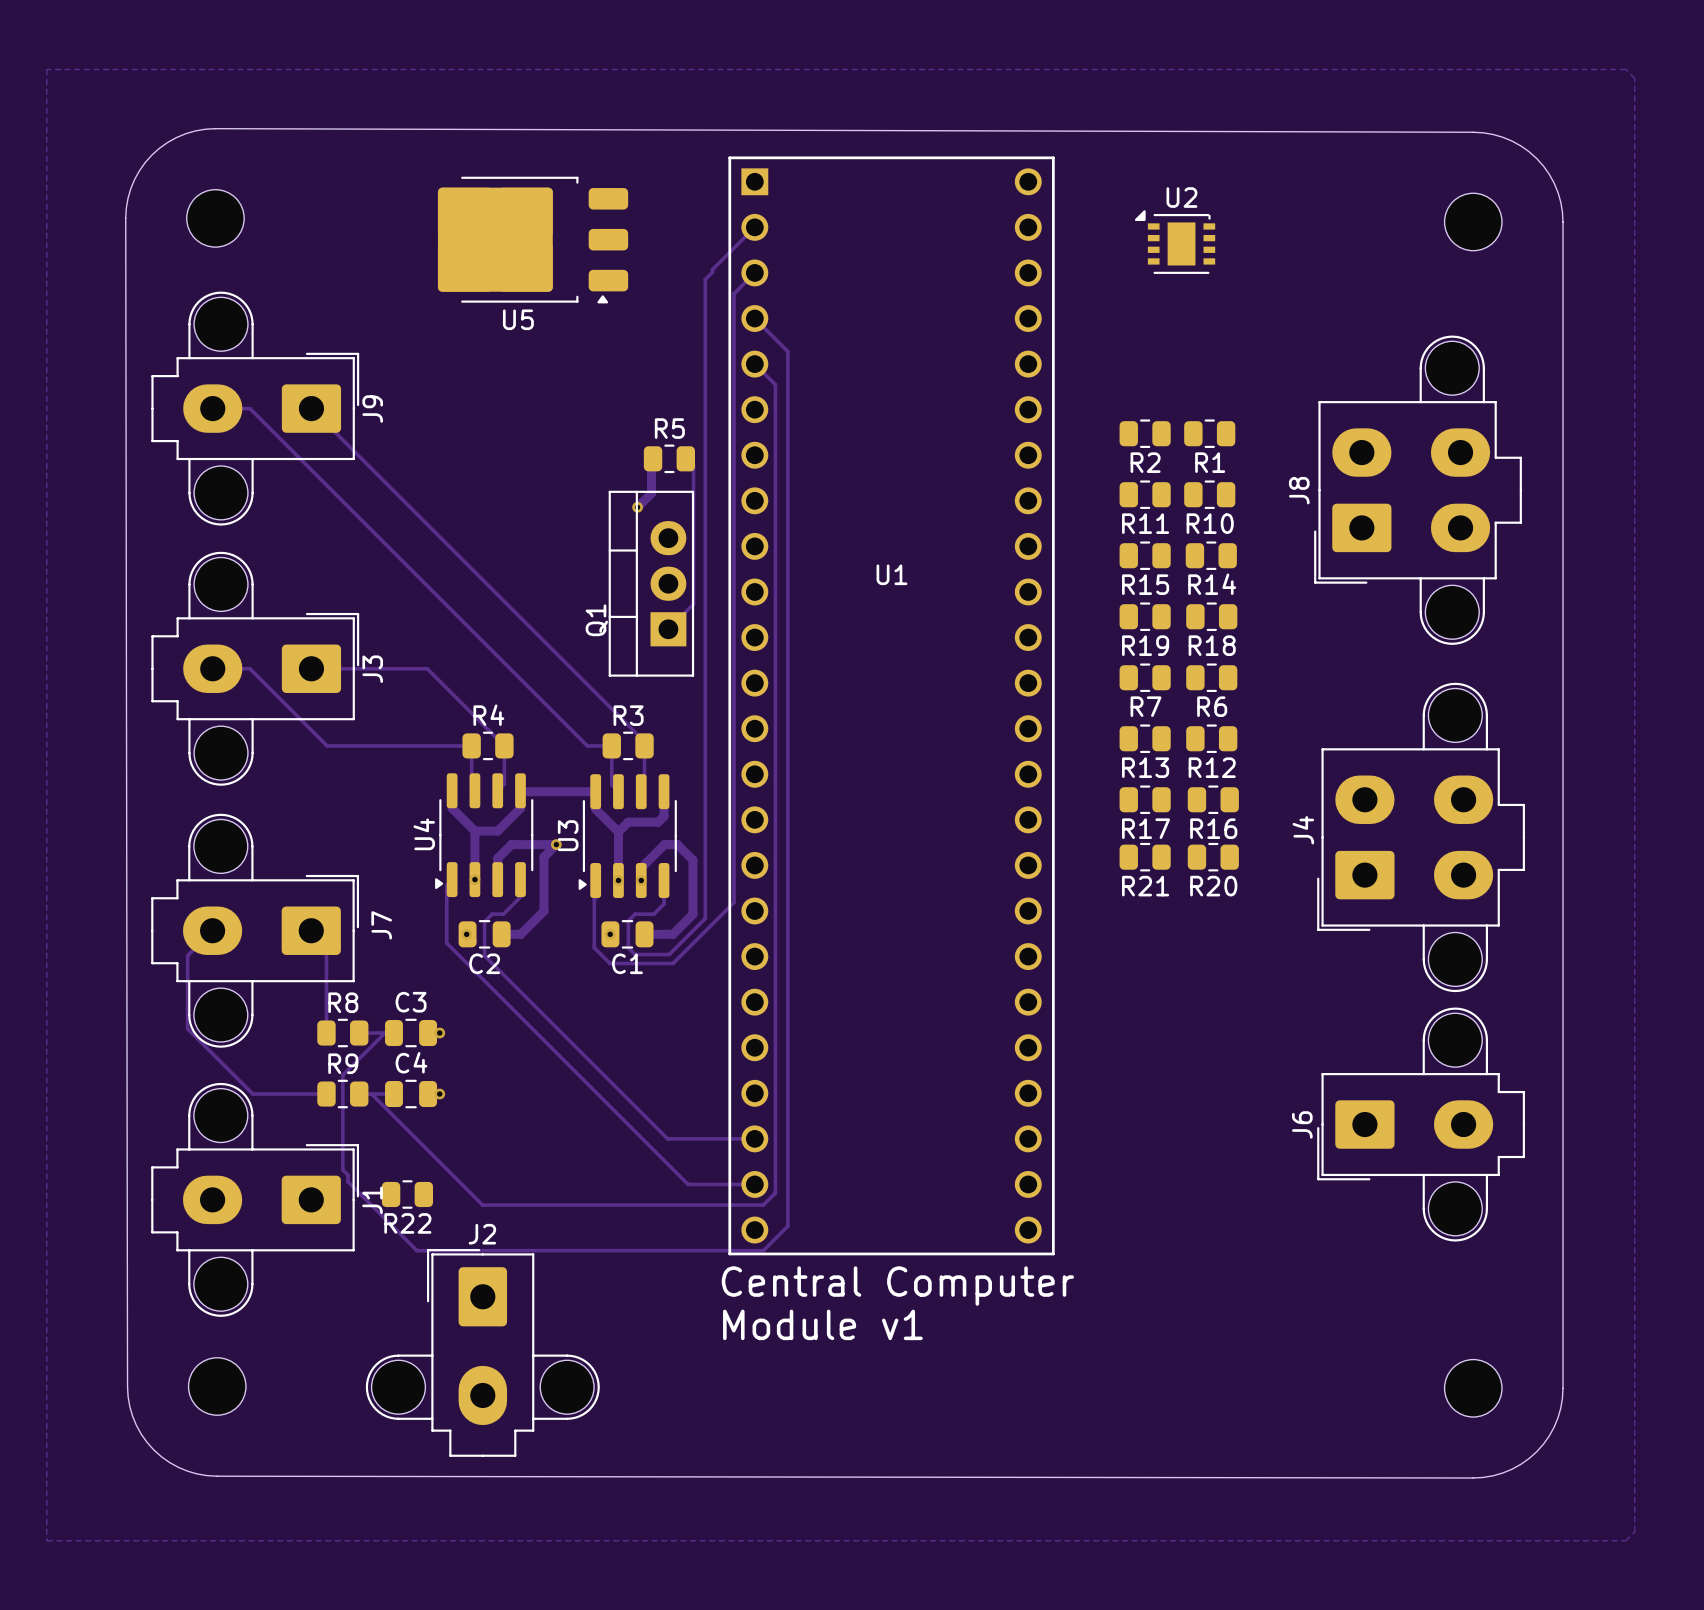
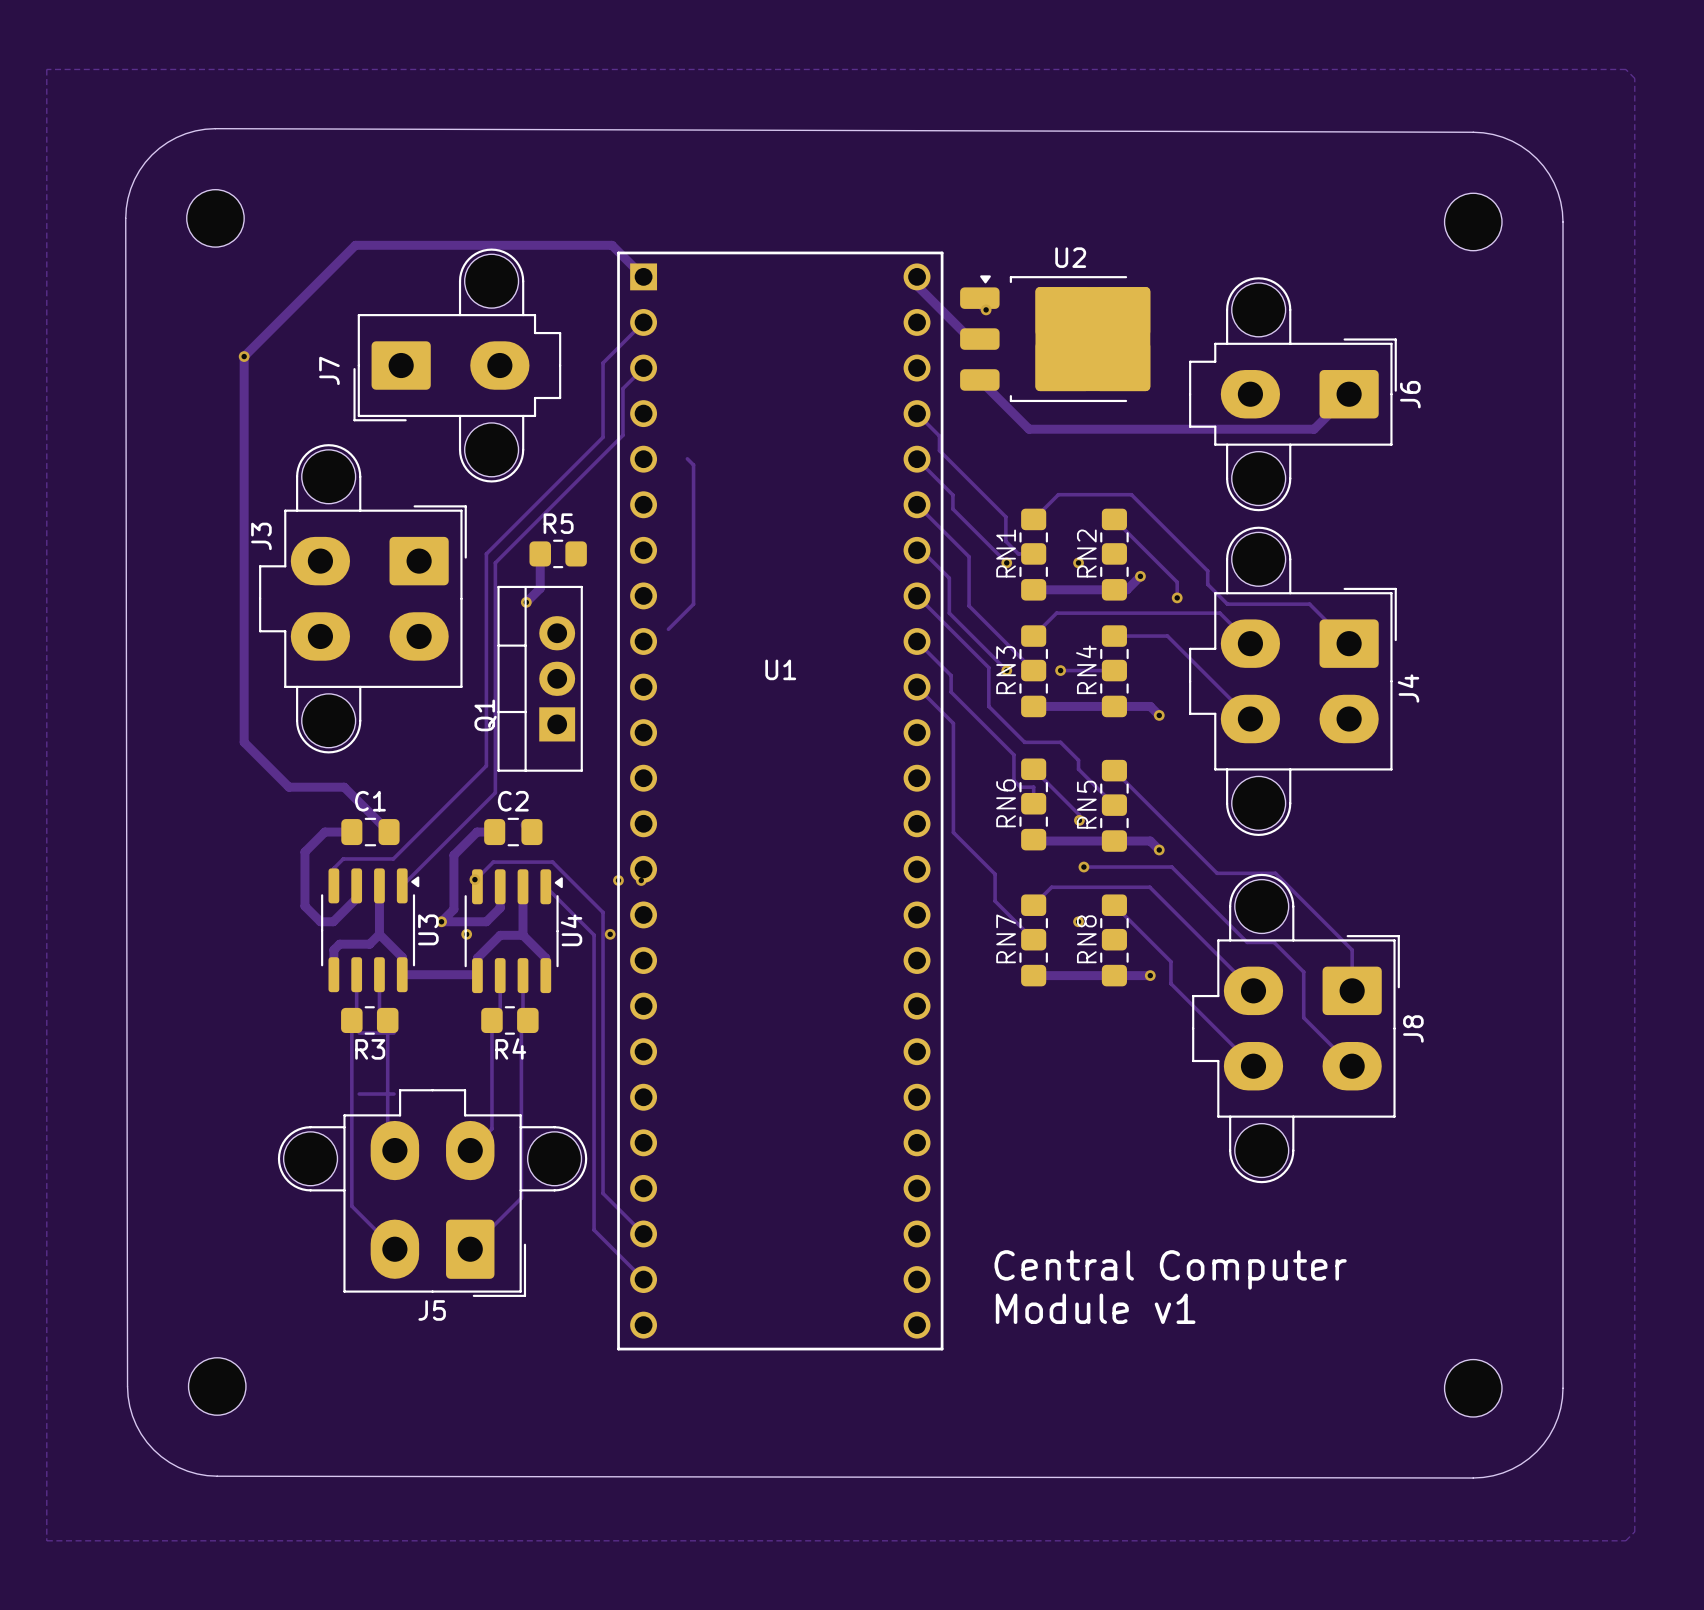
U2 name position: U2 (1181, 197) -> U2 (1070, 257)
U2 footprint: [1134, 210, 1216, 274] -> [960, 275, 1151, 403]
track: (754, 227) (705, 279) (705, 918) (669, 954) (635, 954) (628, 947) (628, 920) (635, 914) (653, 914) (664, 904) (664, 880) -> none
U5: (533, 240) -> none
track: (754, 272) (734, 293) (734, 902) (673, 963) (609, 963) (594, 947) (595, 880) -> none
track: none -> (643, 276) (612, 245) (355, 245) (244, 356) (244, 742) (289, 787) (344, 787) (387, 832)
track: none -> (917, 276) (917, 285) (970, 339)
via: none -> (986, 309)
track: (754, 318) (787, 351) (787, 1226) (763, 1250) (416, 1250) (348, 1181) (348, 1175) (342, 1169) (342, 1075) (385, 1033) -> none
track: none -> (643, 322) (603, 363) (603, 437) (486, 553) (486, 765) (393, 858) (343, 858) (333, 868) (333, 885)
via: none -> (244, 356)
track: (754, 364) (775, 384) (775, 1193) (763, 1205) (482, 1205) (371, 1094) -> none
track: none -> (643, 368) (622, 388) (622, 435) (495, 562) (495, 792) (402, 885)
track: none -> (979, 379) (1029, 429) (1314, 429) (1349, 394)
track: (212, 408) (249, 408) (587, 745) (611, 745) (611, 784) (618, 791) -> none
J9: (255, 408) -> none
track: (311, 408) (644, 741) (644, 788) (641, 791) -> none
track: none -> (917, 413) (939, 436) (939, 450) (1005, 516) (1005, 541) (1018, 553) (1033, 553) (1033, 547)
R2: (1145, 433) -> none
R1: (1209, 433) -> none
R5 footprint: [643, 444, 695, 474] -> [529, 539, 587, 569]
track: (651, 458) (651, 493) (637, 507) -> (540, 553) (540, 588) (526, 602)
track: none -> (917, 459) (952, 495) (952, 509) (1006, 562)
J8 rotation: 0° (1418, 490) -> 180° (1296, 1028)
J8 position: (1418, 490) -> (1296, 1028)
R11: (1145, 494) -> none
R10: (1209, 494) -> none
track: none -> (917, 504) (969, 556) (969, 605) (1033, 670)
via: (637, 507) -> none
track: none -> (1033, 519) (1058, 494) (1131, 494) (1207, 570) (1207, 584) (1227, 604) (1309, 604) (1349, 643)
track: none -> (1114, 519) (1177, 582) (1177, 597)
track: none -> (917, 550) (921, 550) (949, 578) (949, 613) (1006, 670)
J3 footprint: [151, 551, 360, 786] -> [259, 444, 467, 754]
RN1: none -> (1033, 554)
RN2: none -> (1114, 554)
R15: (1145, 555) -> none
R14: (1211, 555) -> none
via: none -> (1006, 562)
via: none -> (1078, 562)
track: none -> (1140, 576) (1126, 589) (1033, 589)
via: none -> (1140, 576)
Q1 position: (651, 583) -> (540, 678)
track: none -> (917, 595) (988, 667) (988, 706) (1024, 742) (1060, 742) (1078, 760) (1078, 769) (1114, 805)
via: none -> (1177, 597)
via: none -> (526, 602)
R19: (1145, 616) -> none
R18: (1211, 616) -> none
track: none -> (1033, 636) (1056, 613) (1219, 613) (1250, 643)
track: none -> (1114, 636) (1167, 636) (1250, 719)
track: none -> (917, 641) (951, 675) (951, 692) (1013, 754) (1013, 780) (1020, 787) (1033, 787) (1033, 803)
track: (212, 668) (249, 668) (327, 745) (471, 745) (471, 787) (474, 790) -> none
track: (311, 668) (427, 668) (504, 745) (504, 784) (497, 790) -> none
J3 name position: J3 (372, 669) -> J3 (261, 536)
via: none -> (1006, 670)
track: none -> (1060, 670) (1114, 670)
via: none -> (1060, 670)
RN3: none -> (1033, 671)
RN4: none -> (1114, 671)
R7: (1145, 677) -> none
R6: (1211, 677) -> none
track: none -> (917, 687) (953, 723) (953, 832) (995, 874) (995, 901) (1033, 939)
U1 position: (891, 705) -> (780, 801)
track: none -> (1033, 706) (1150, 706) (1159, 715)
R4 name position: R4 (488, 715) -> R4 (510, 1048)
R3 name position: R3 (628, 715) -> R3 (370, 1049)
via: none -> (1159, 715)
R4 footprint: [462, 731, 514, 761] -> [481, 1006, 539, 1035]
R3 footprint: [602, 731, 654, 761] -> [341, 1006, 399, 1035]
R13: (1145, 738) -> none
R12: (1211, 738) -> none
track: none -> (1033, 769) (1079, 815) (1079, 820)
track: none -> (1114, 770) (1217, 873) (1275, 873) (1352, 950) (1352, 990)
track: (452, 790) (452, 808) (474, 831) -> none
track: (664, 791) (664, 816) (658, 822) (628, 822) (618, 831) -> none
R17: (1145, 799) -> none
R16: (1213, 799) -> none
RN6: none -> (1033, 804)
RN5: none -> (1114, 805)
via: none -> (1079, 820)
track: (474, 831) (474, 879) -> (379, 885) (379, 934)
track: (474, 831) (497, 831) (520, 808) (520, 790) (595, 791) (595, 809) (618, 831) -> none
track: (618, 831) (618, 880) -> (523, 886) (523, 935)
track: none -> (351, 832) (324, 832) (304, 852) (304, 906) (320, 921) (333, 921) (356, 898) (356, 885)
track: none -> (494, 832) (477, 832) (453, 855) (453, 909) (441, 921) (486, 921) (500, 907) (500, 886)
U4 rotation: 0° (484, 835) -> 180° (513, 931)
U4 position: (484, 835) -> (513, 931)
U3 rotation: 0° (627, 836) -> 180° (370, 930)
U3 position: (627, 836) -> (370, 930)
J4 rotation: 0° (1421, 837) -> 180° (1292, 681)
J4 position: (1421, 837) -> (1292, 681)
track: none -> (1033, 839) (1150, 841) (1159, 849)
via: (556, 844) -> none
via: none -> (1159, 849)
R21: (1145, 857) -> none
R20: (1213, 857) -> none
track: none -> (1083, 867) (1171, 867) (1247, 942) (1274, 942) (1303, 972) (1303, 1017) (1352, 1066)
via: none -> (1083, 867)
track: (452, 879) (446, 884) (446, 943) (688, 1184) (754, 1184) -> none
track: (497, 879) (497, 858) (511, 844) (556, 844) (543, 857) (543, 911) (520, 934) (503, 934) -> none
track: (520, 879) (520, 897) (503, 914) (492, 914) (484, 921) (484, 955) (667, 1138) (754, 1138) -> none
track: (641, 880) (641, 867) (664, 844) (677, 844) (692, 860) (692, 914) (673, 934) (646, 934) -> none
track: none -> (477, 886) (477, 878) (493, 862) (552, 862) (603, 912) (603, 1193) (643, 1233)
track: none -> (545, 886) (594, 935) (594, 1230) (643, 1279)
track: none -> (1033, 905) (1051, 887) (1149, 887) (1253, 990)
track: none -> (1114, 905) (1170, 961) (1170, 983) (1253, 1066)
C2 footprint: [458, 920, 511, 949] -> [484, 817, 543, 847]
C1 footprint: [601, 920, 654, 949] -> [341, 817, 400, 847]
via: none -> (441, 921)
via: none -> (1078, 921)
track: (212, 930) (187, 955) (187, 1028) (252, 1094) (326, 1094) -> none
J7 rotation: 0° (255, 930) -> 180° (457, 365)
J7 position: (255, 930) -> (457, 365)
track: (311, 930) (326, 945) (326, 1033) -> none
track: none -> (379, 934) (369, 944) (339, 944) (333, 950) (333, 974)
track: none -> (379, 934) (402, 957) (402, 974) (477, 975) (477, 958) (500, 935) (523, 935)
track: none -> (523, 935) (545, 958) (545, 975)
RN7: none -> (1033, 940)
RN8: none -> (1114, 940)
C2 name position: C2 (484, 963) -> C2 (513, 801)
C1 name position: C1 (627, 963) -> C1 (370, 801)
track: none -> (356, 974) (356, 1015) (351, 1020) (351, 1206) (394, 1249)
track: none -> (379, 974) (379, 1012) (387, 1020) (387, 1143) (394, 1150)
track: none -> (500, 975) (500, 1012) (491, 1020) (491, 1128) (470, 1150)
track: none -> (523, 975) (523, 1015) (527, 1020) (521, 1026) (521, 1198) (470, 1249)
track: none -> (1033, 975) (1150, 975)
via: none -> (1150, 975)
R8: (342, 1033) -> none
C3: (411, 1033) -> none
via: (439, 1033) -> none
R9: (342, 1094) -> none
C4: (411, 1094) -> none
via: (439, 1094) -> none
J6 rotation: 0° (1421, 1124) -> 180° (1292, 394)
J6 position: (1421, 1124) -> (1292, 394)
J5: none -> (432, 1193)
R22: (407, 1194) -> none
J1: (255, 1199) -> none
text position: Central Computer (897, 1286) -> Central Computer (1170, 1269)
text position: Module v1 (822, 1324) -> Module v1 (1095, 1308)
J2: (482, 1352) -> none

